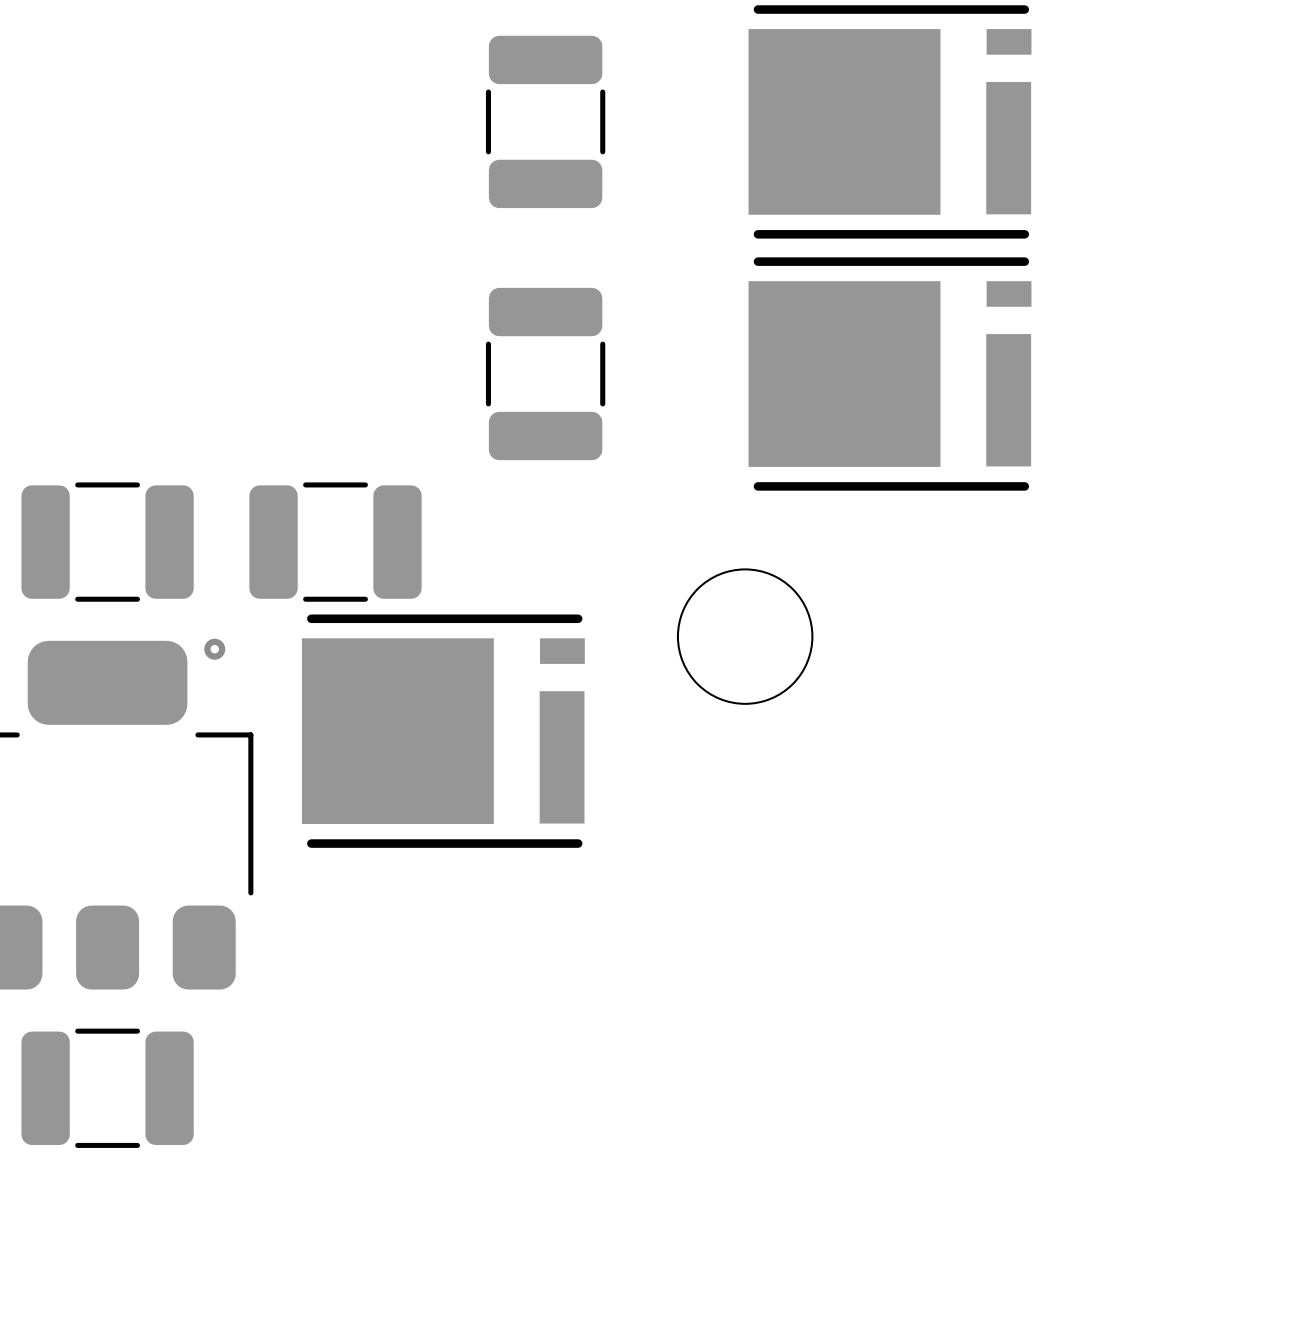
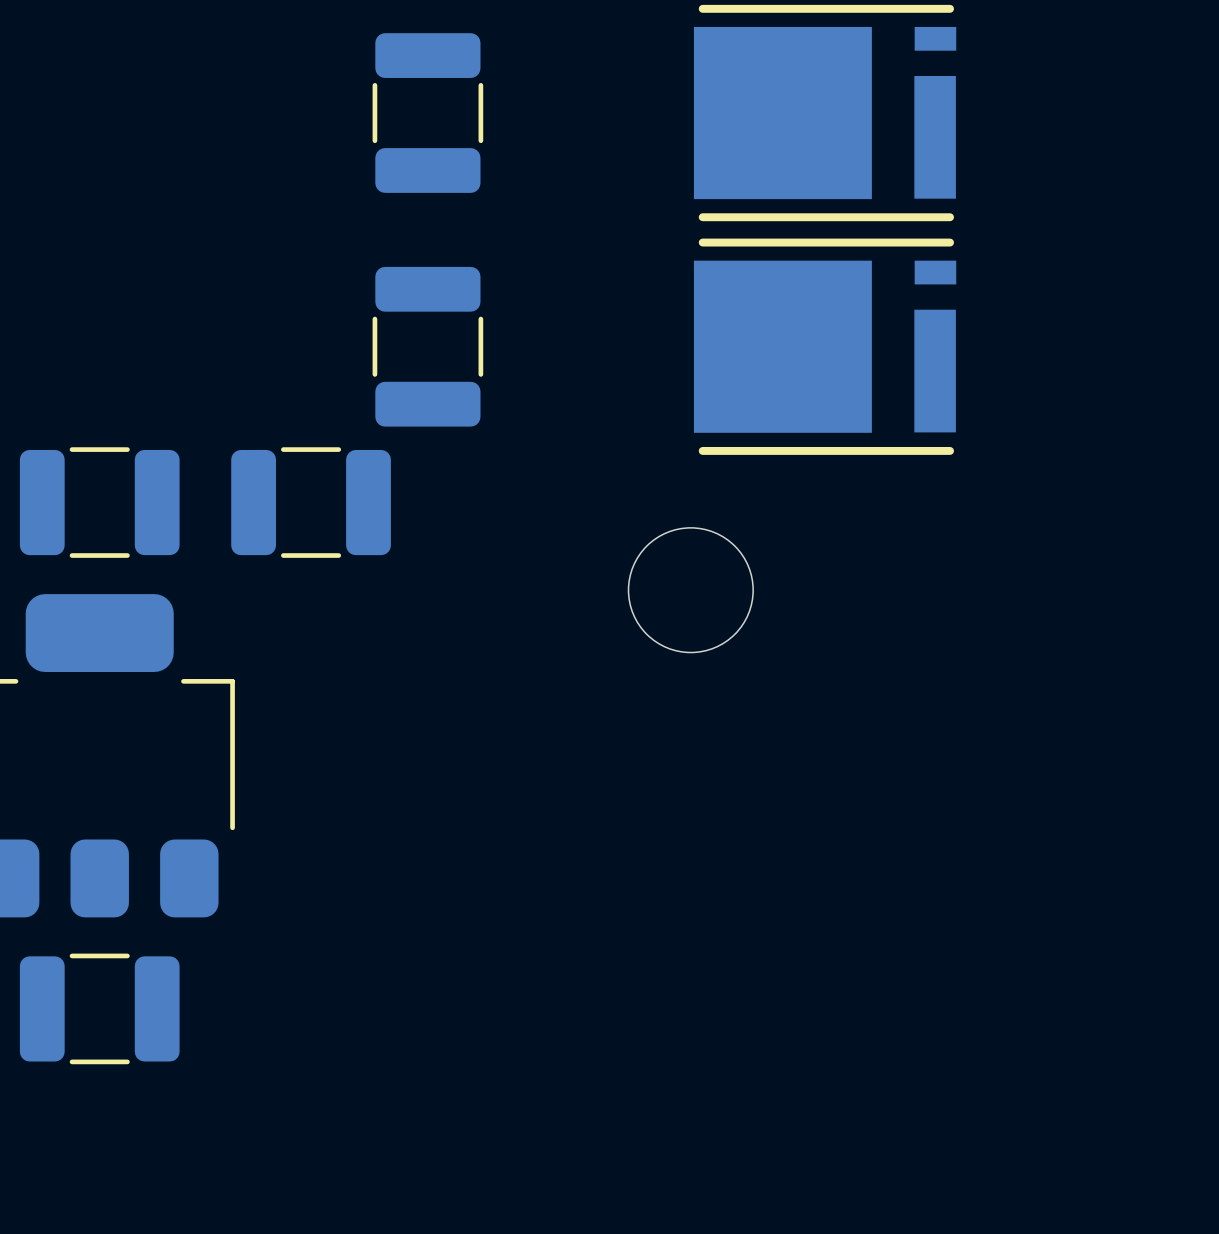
part position: (545, 121) -> (427, 113)
part position: (545, 374) -> (427, 346)
via: (214, 649) -> none
part: (443, 731) -> none

